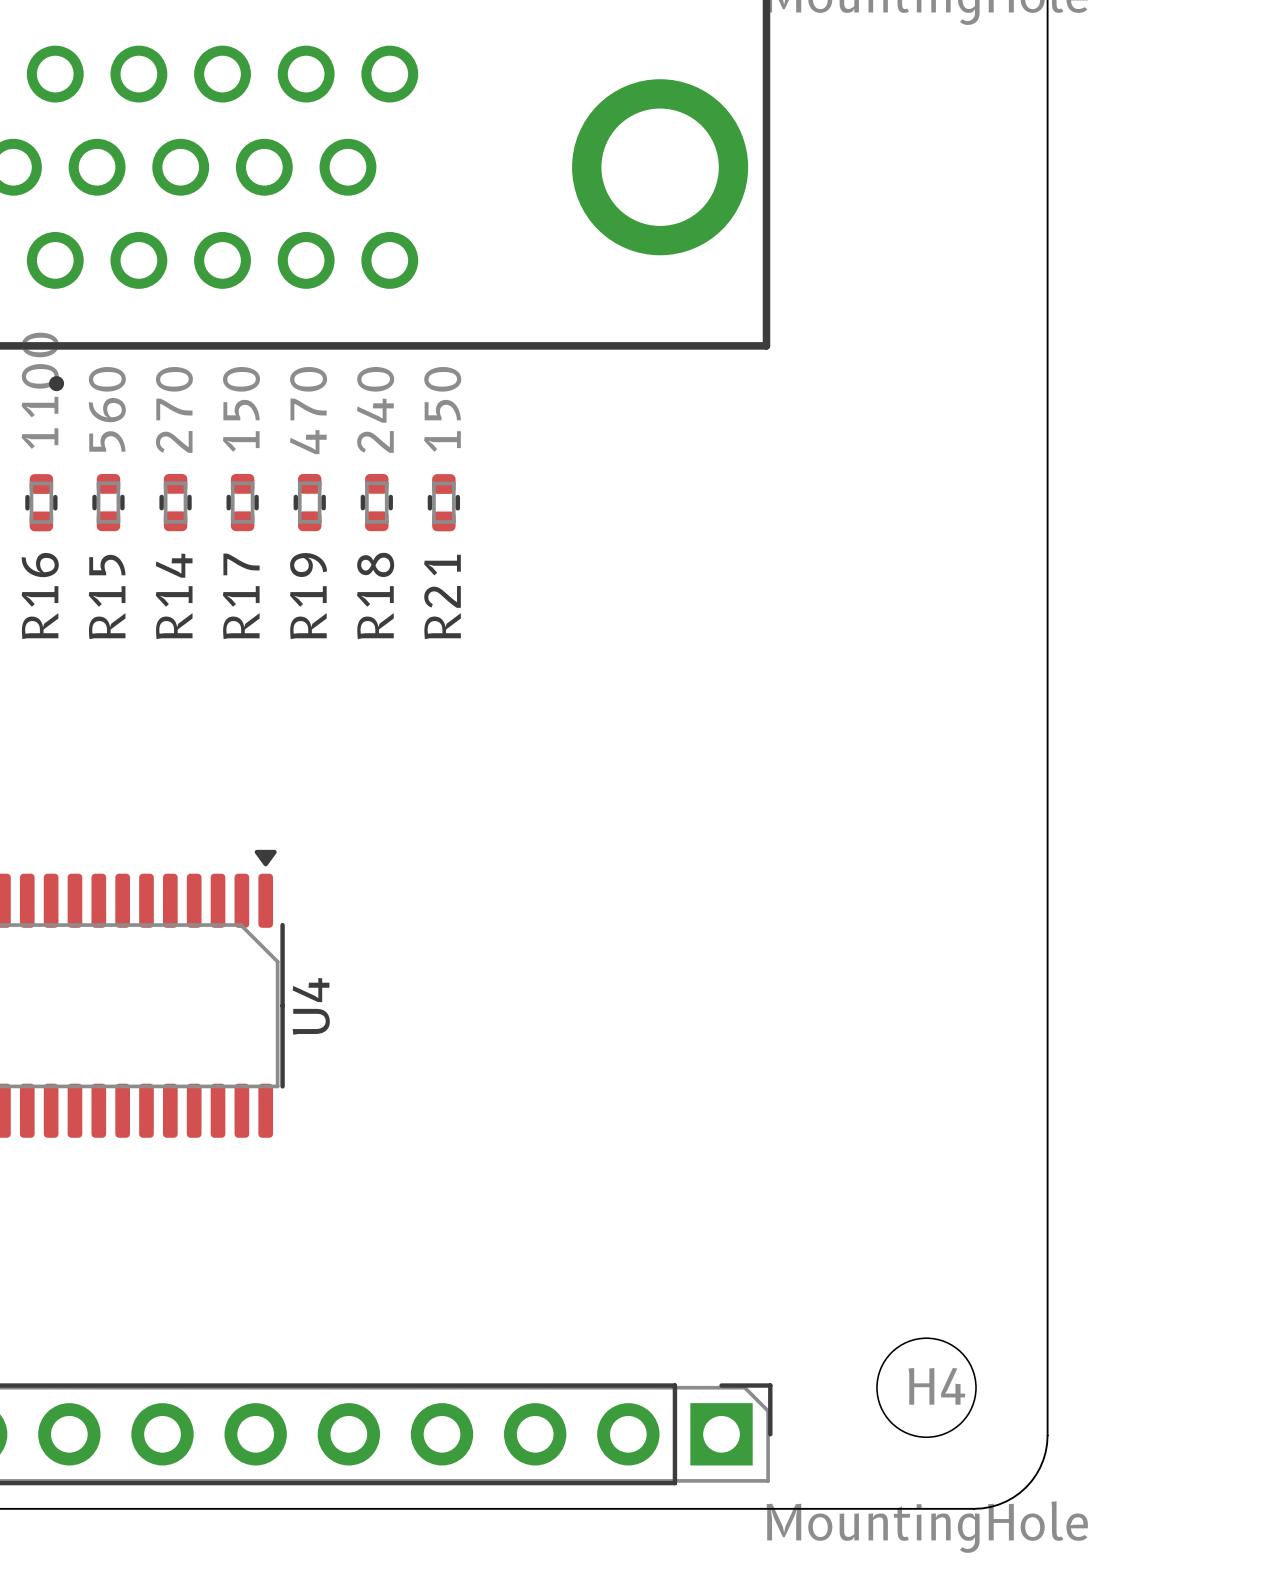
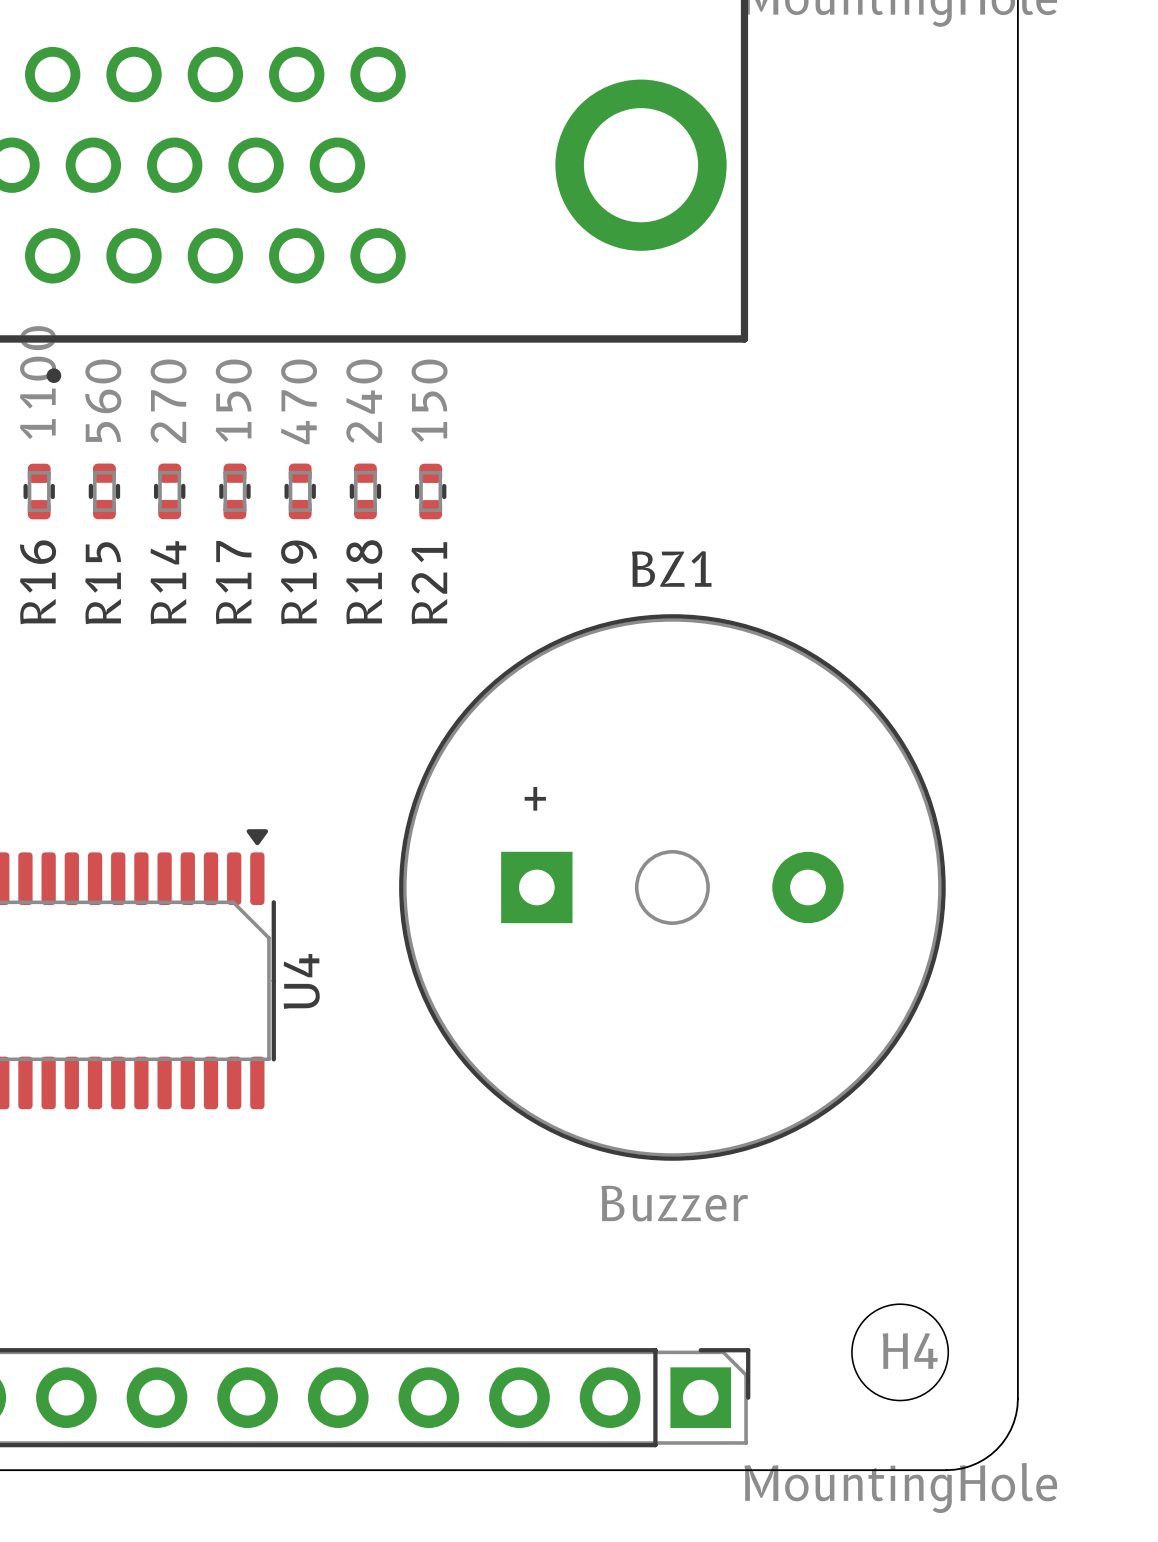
BZ1: none -> Buzzer (672, 887)

